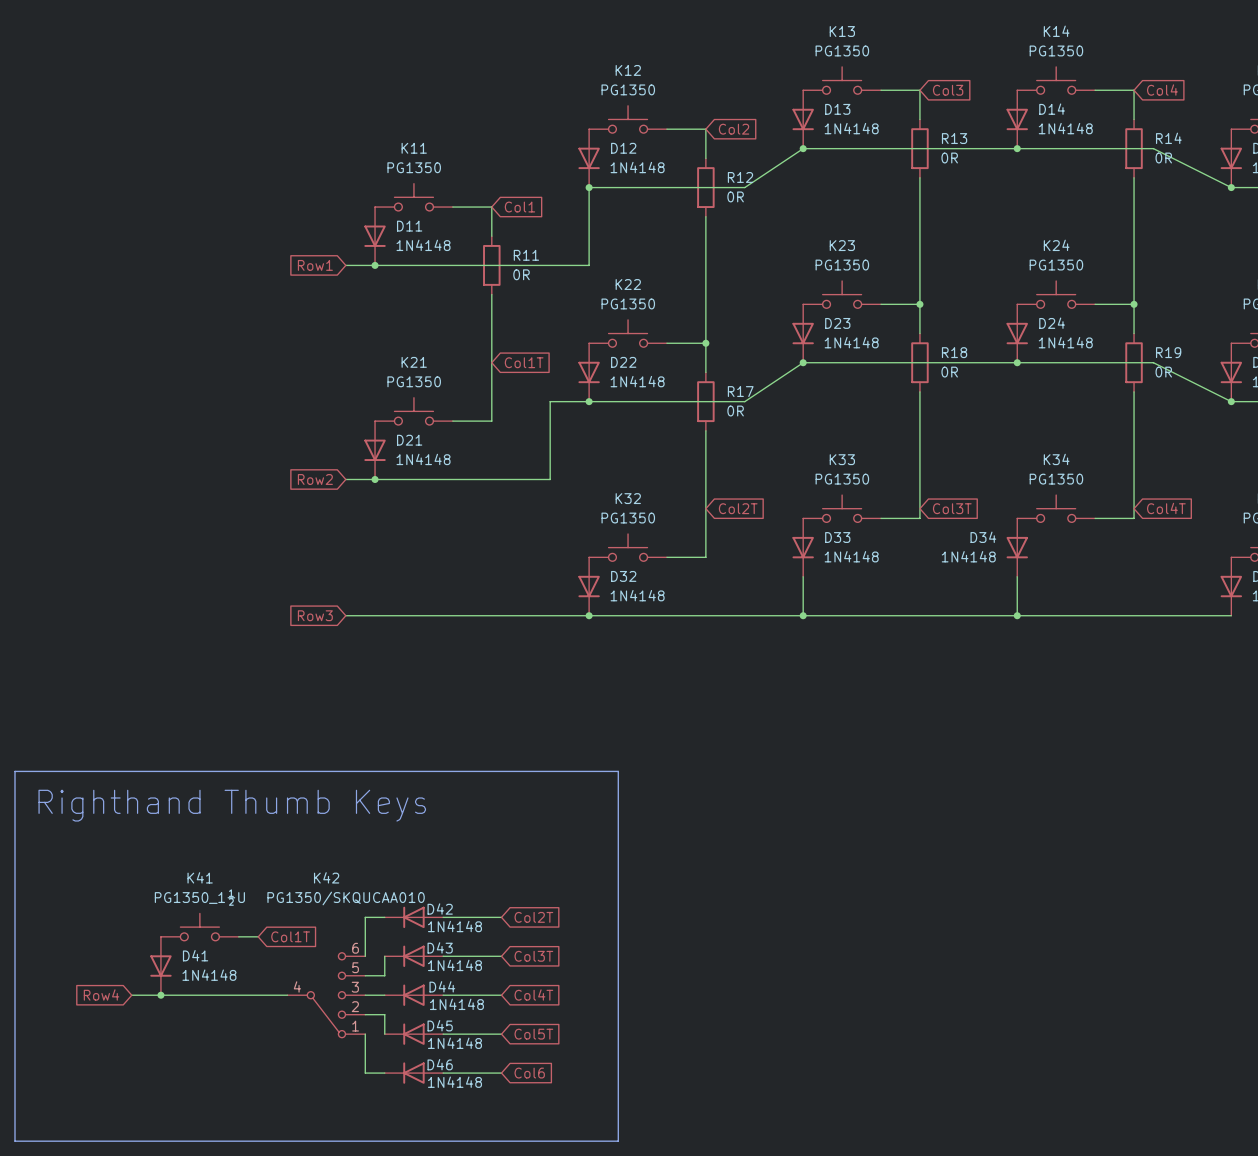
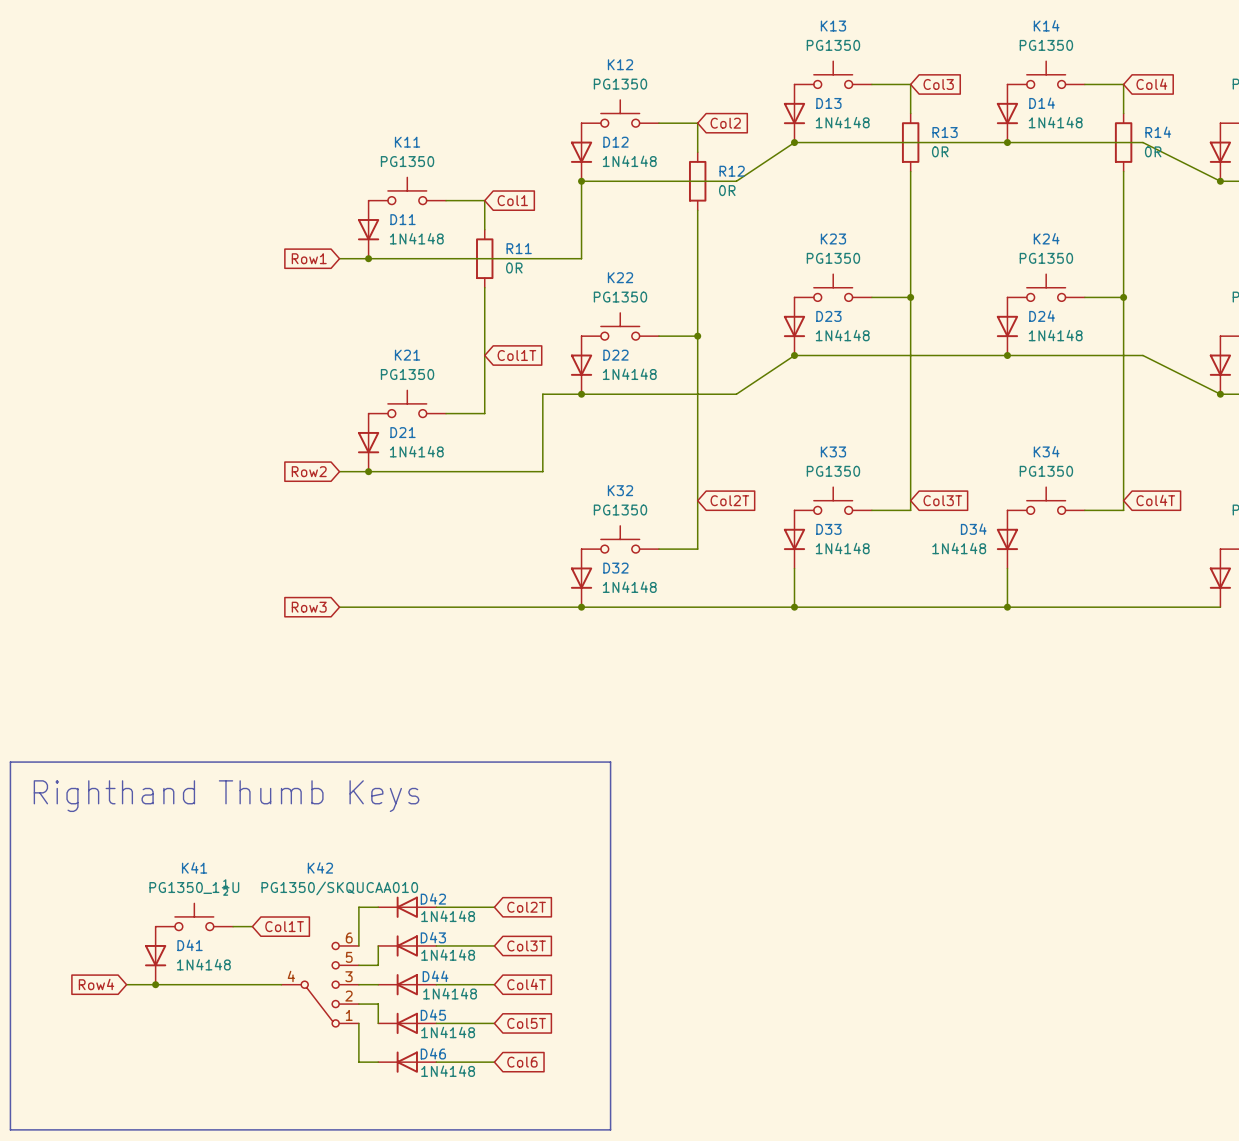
wire: none -> (910, 326) (910, 384)
wire: none -> (1123, 326) (1123, 384)
R18: 0R (919, 362) -> none
R19: 0R (1134, 362) -> none
wire: none -> (697, 365) (697, 423)
R17: 0R (705, 401) -> none

